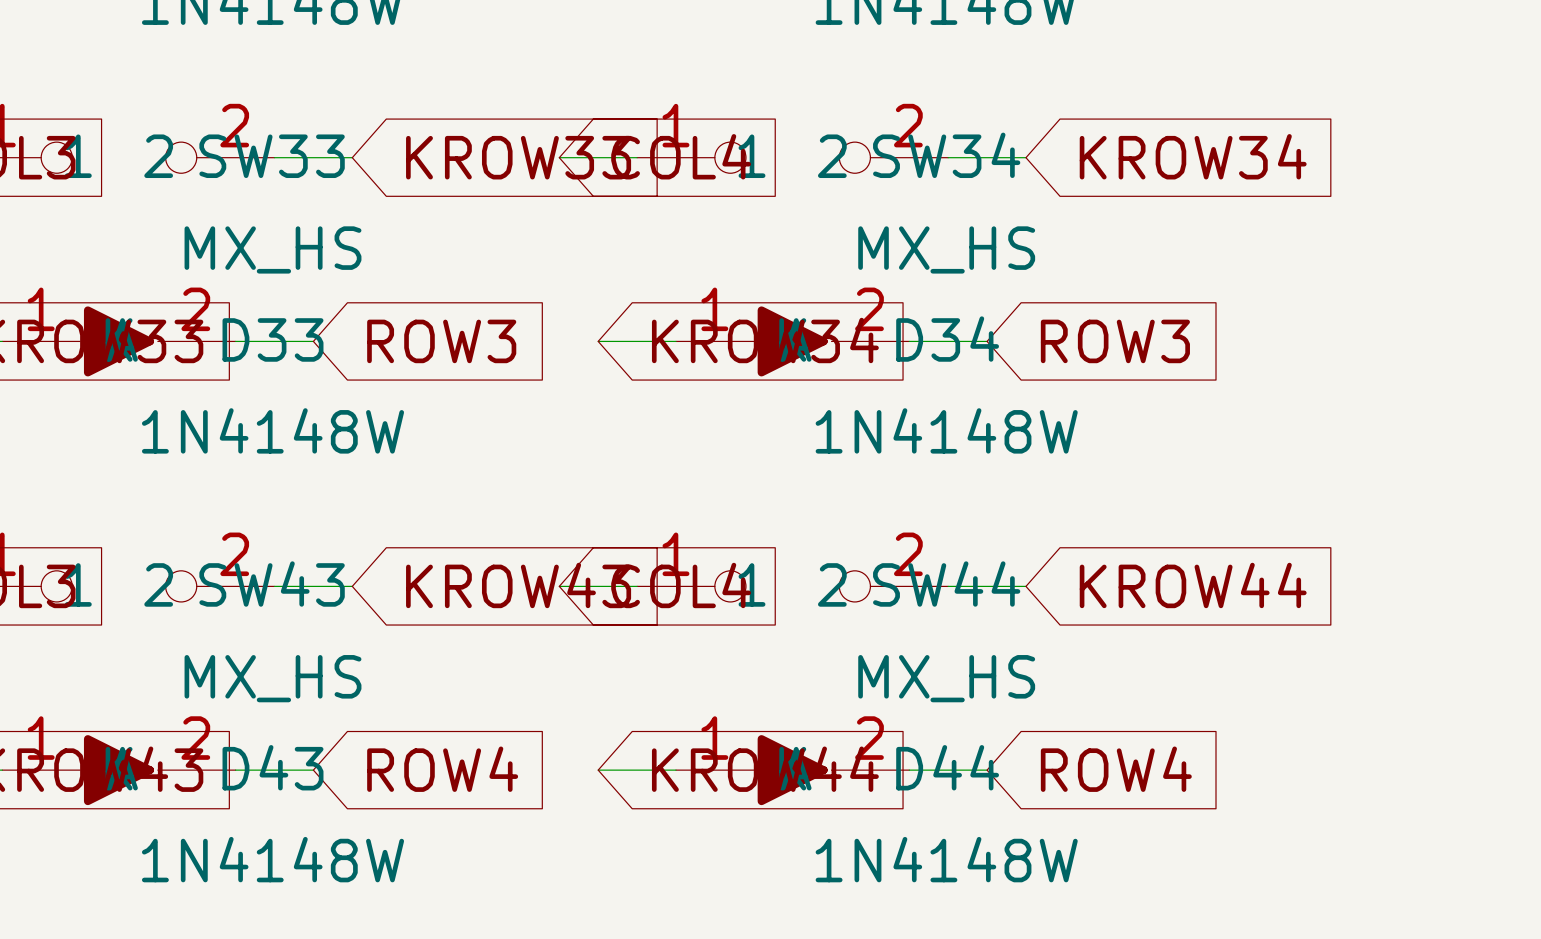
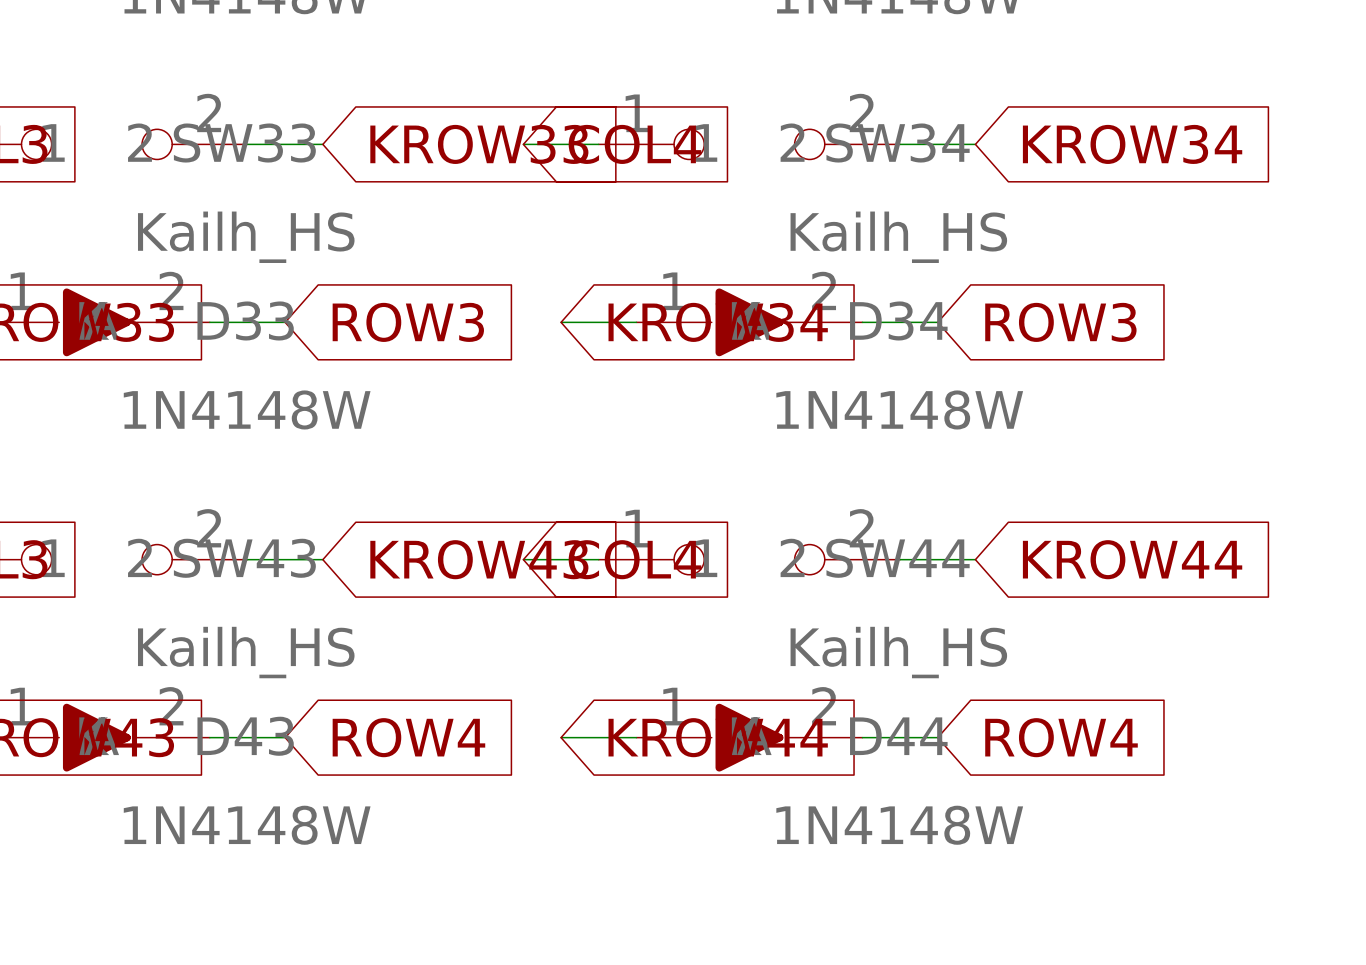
SW33 value: MX_HS (272, 249) -> Kailh_HS (246, 237)
SW34 value: MX_HS (946, 249) -> Kailh_HS (898, 237)
SW43 value: MX_HS (272, 678) -> Kailh_HS (246, 652)
SW44 value: MX_HS (946, 678) -> Kailh_HS (898, 652)

